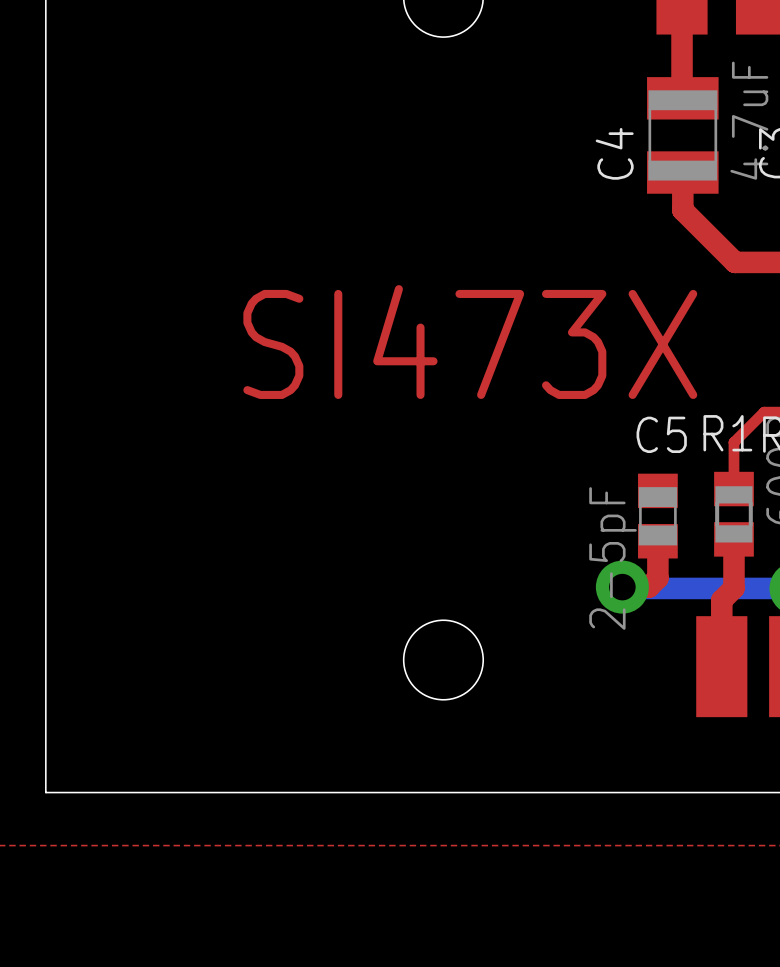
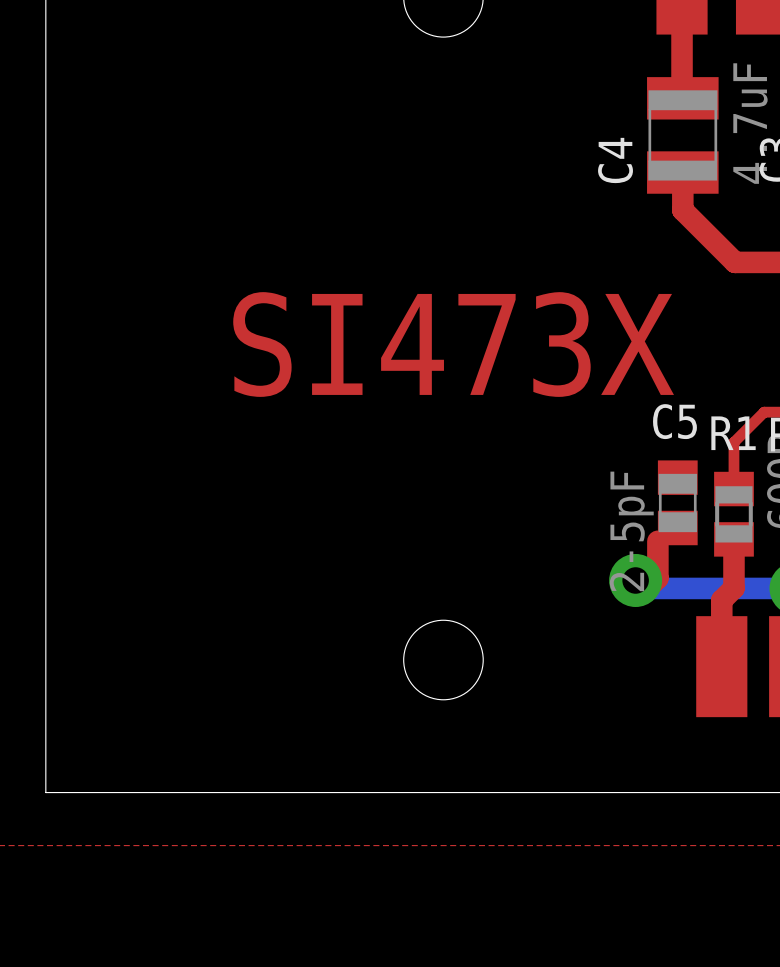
C5 position: (657, 516) -> (677, 502)
via position: (622, 587) -> (635, 580)

